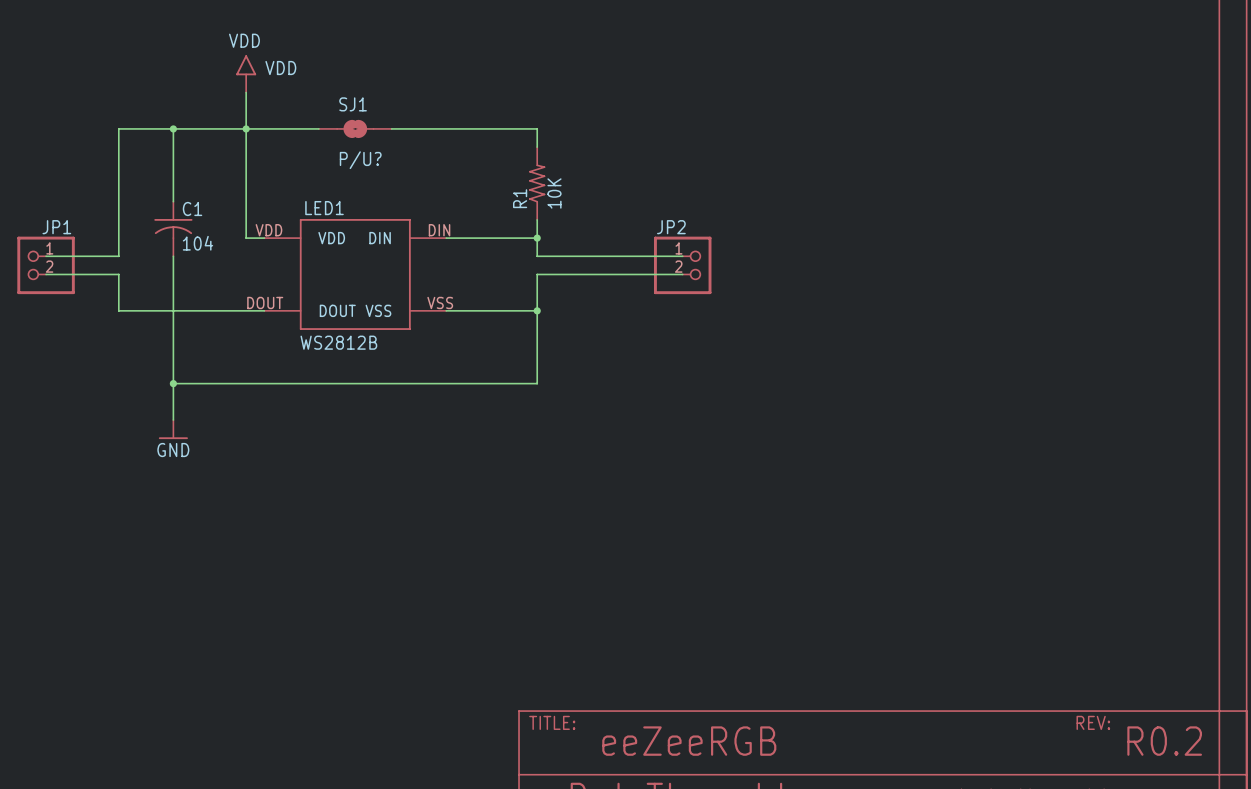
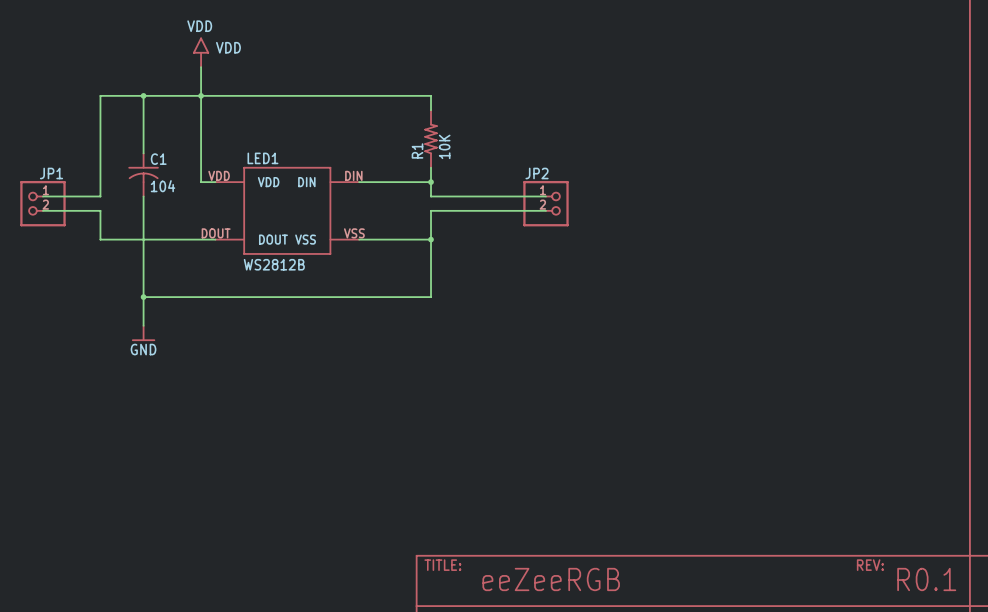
SJ1: P/U? (355, 128) -> none
text: R0.2 (1164, 741) -> R0.1 (926, 579)

